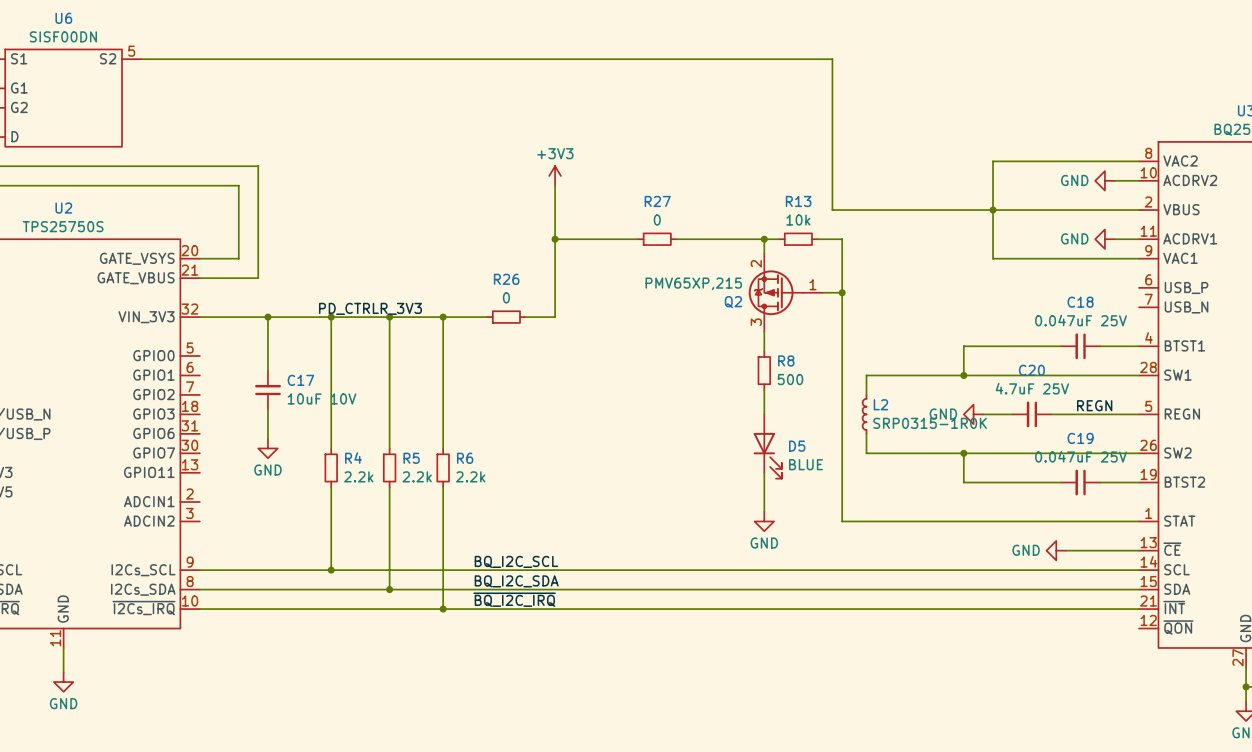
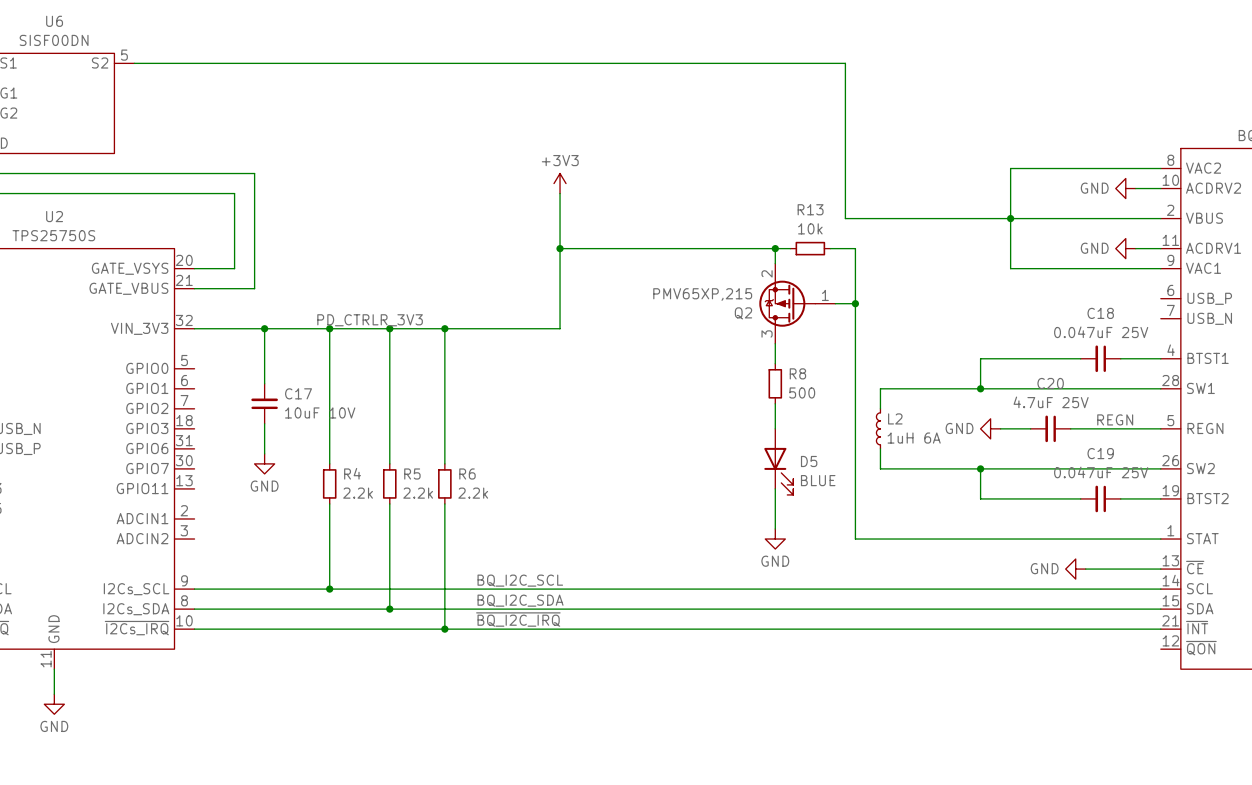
wire: none -> (645, 248) (685, 248)
R27: 0 (657, 239) -> none
wire: none -> (489, 328) (529, 328)
R26: 0 (506, 317) -> none
L2 value: SRP0315-1R0K (930, 423) -> 1uH 6A (914, 438)

